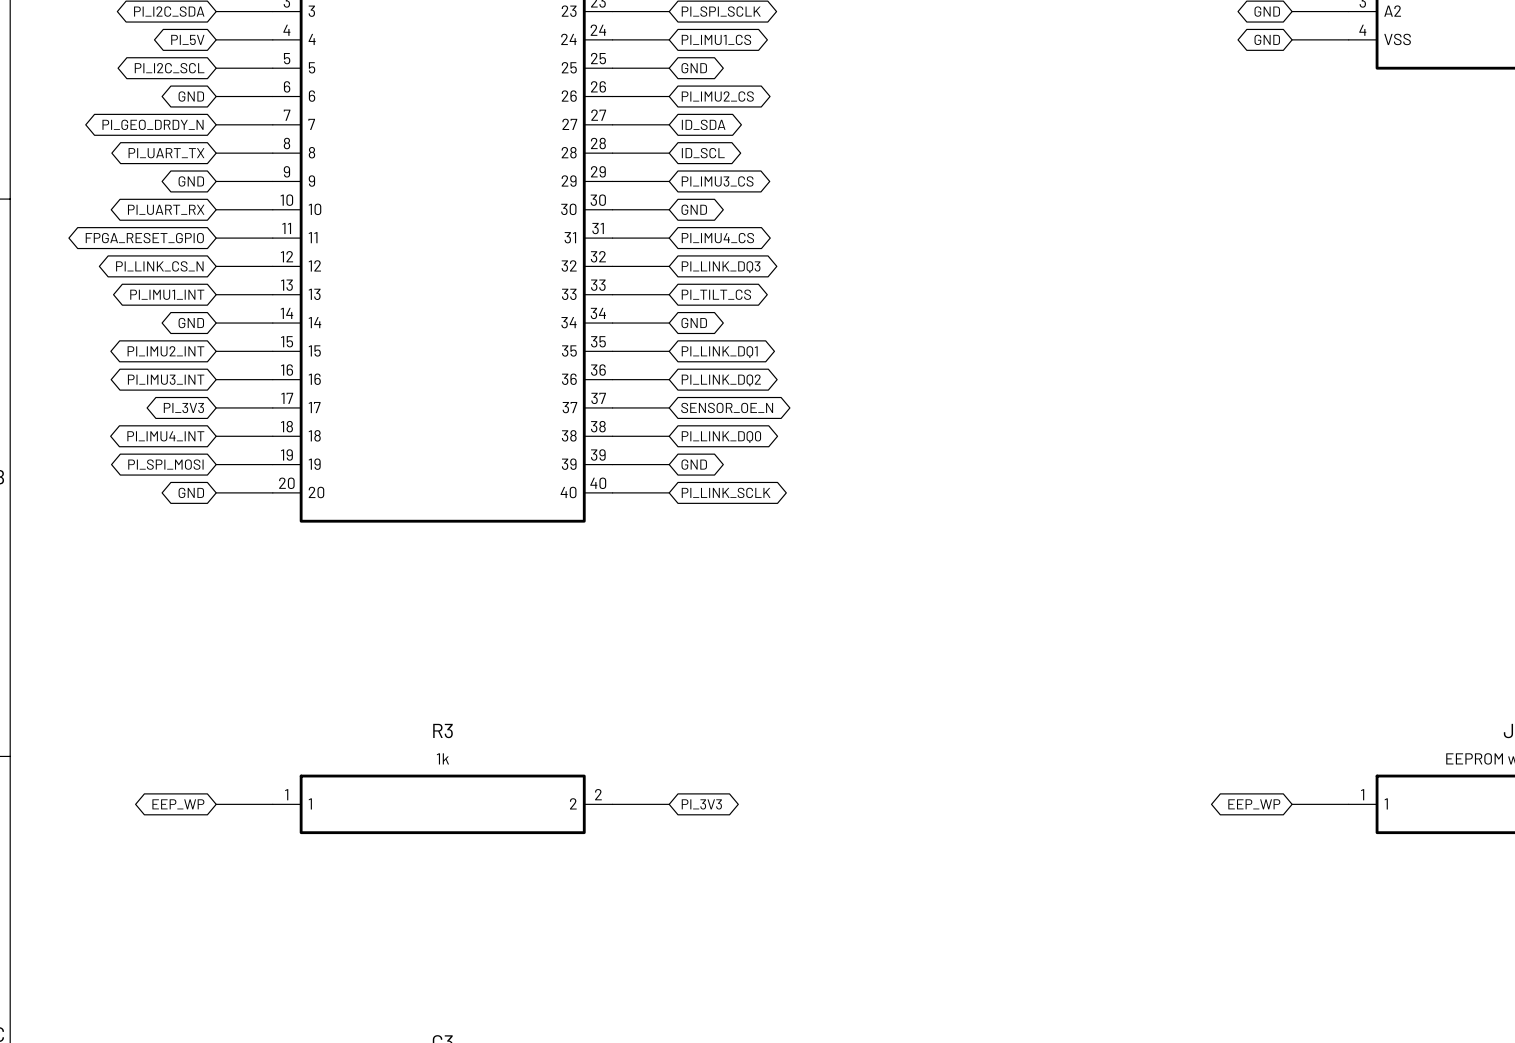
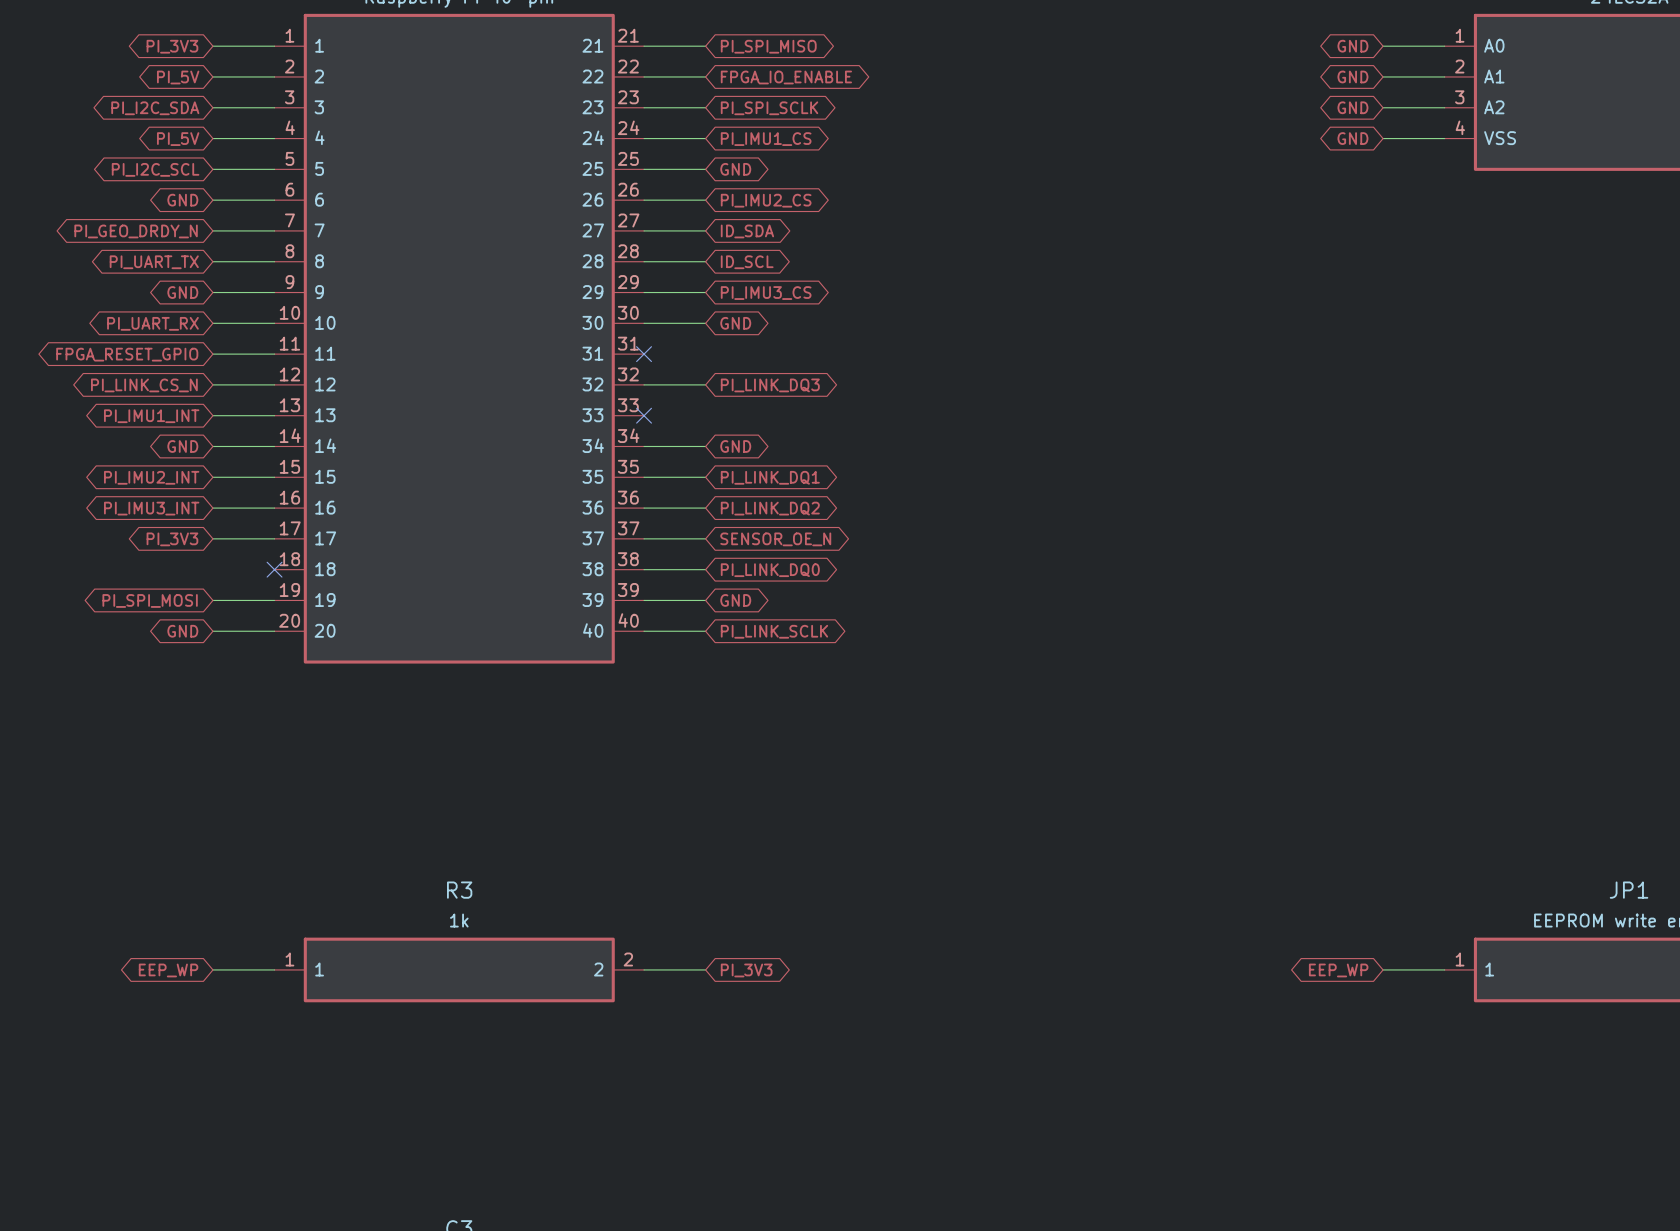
wire: (612, 238) (669, 238) -> none
no-connect mark: none -> (644, 354)
global label: PI_IMU4_CS (717, 238) -> none
wire: (612, 294) (669, 294) -> none
no-connect mark: none -> (644, 415)
global label: PI_TILT_CS (716, 294) -> none
global label: PI_IMU4_INT (165, 436) -> none
wire: (216, 436) (272, 436) -> none
no-connect mark: none -> (274, 569)

